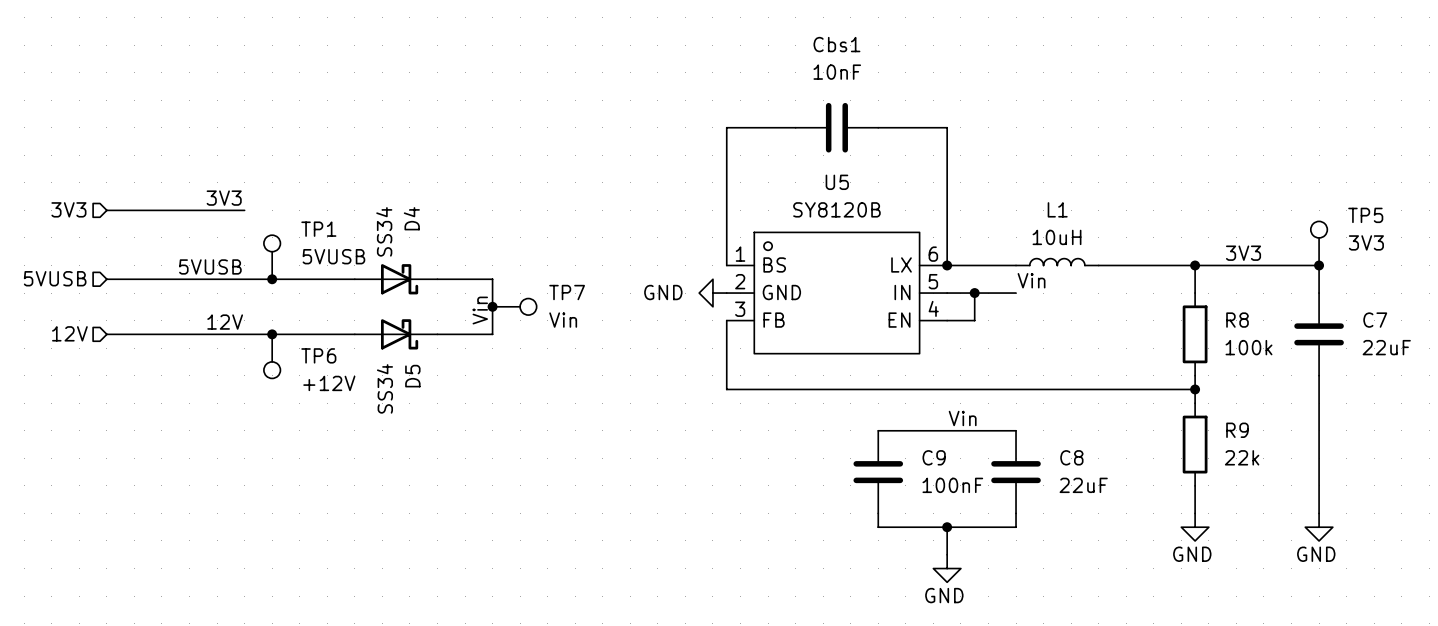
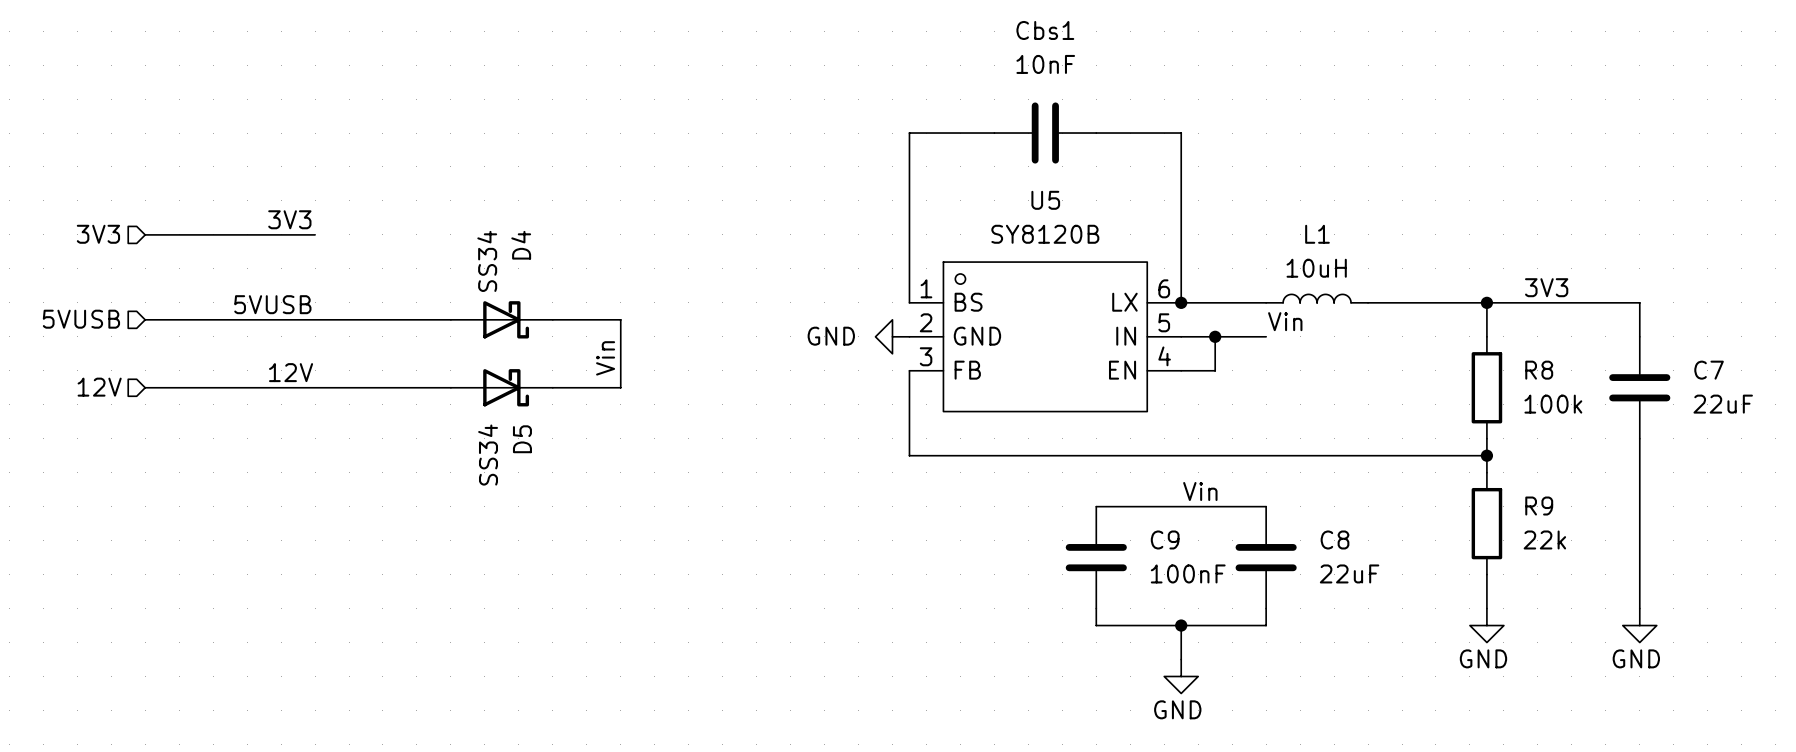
TP5: 3V3 (1319, 243) -> none
TP1: 5VUSB (272, 257) -> none
junction: (1319, 265) -> none
junction: (272, 279) -> none
junction: (492, 306) -> none
TP7: Vin (514, 306) -> none
junction: (272, 334) -> none
TP6: +12V (272, 356) -> none

